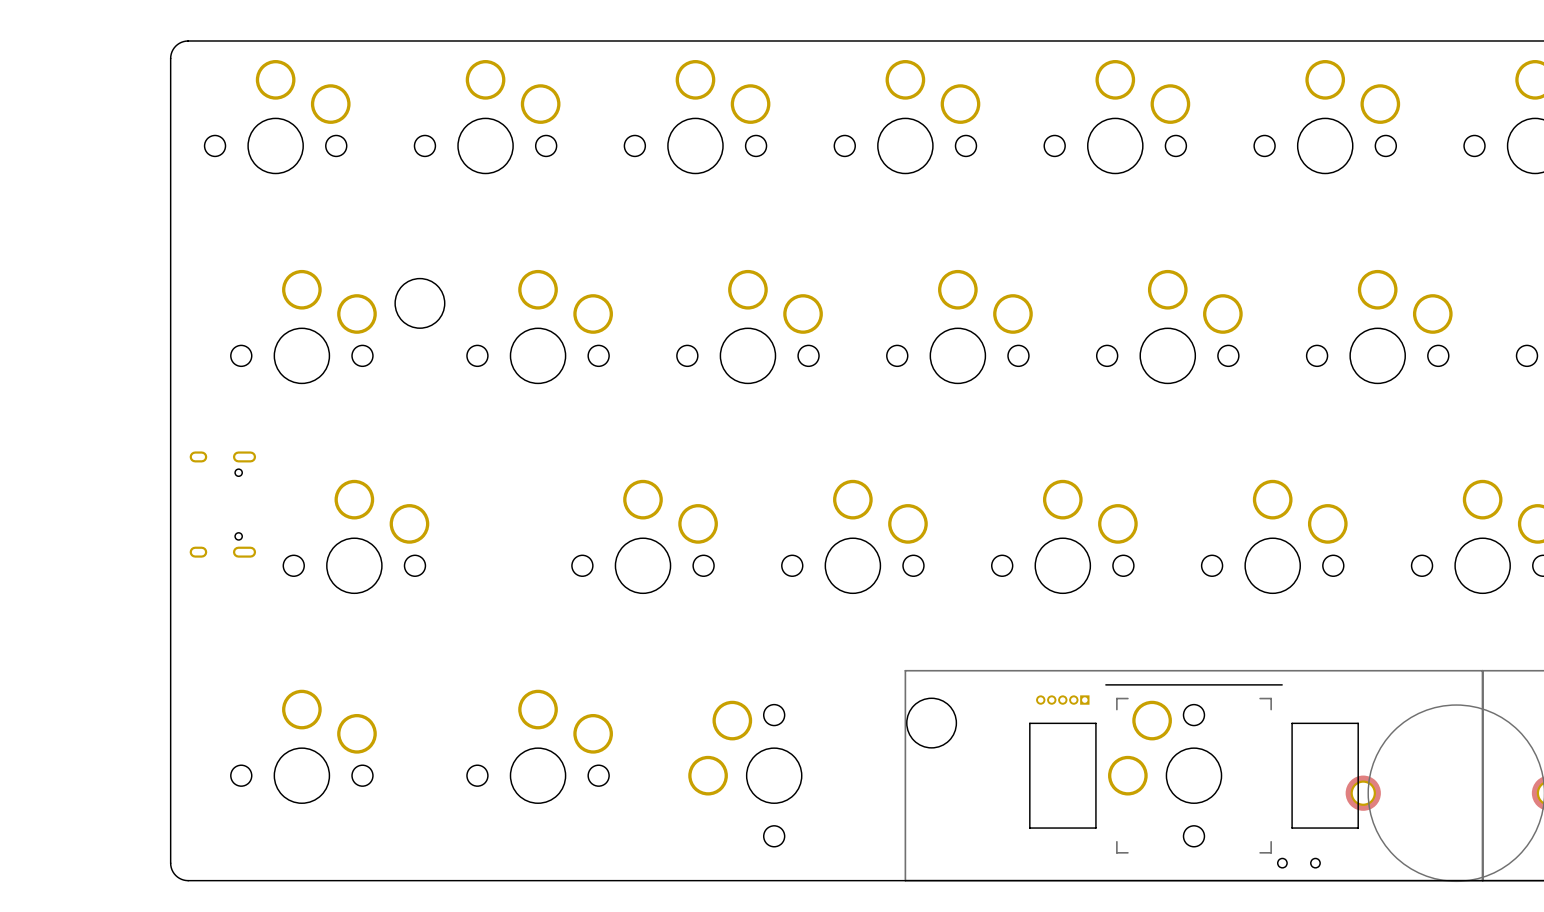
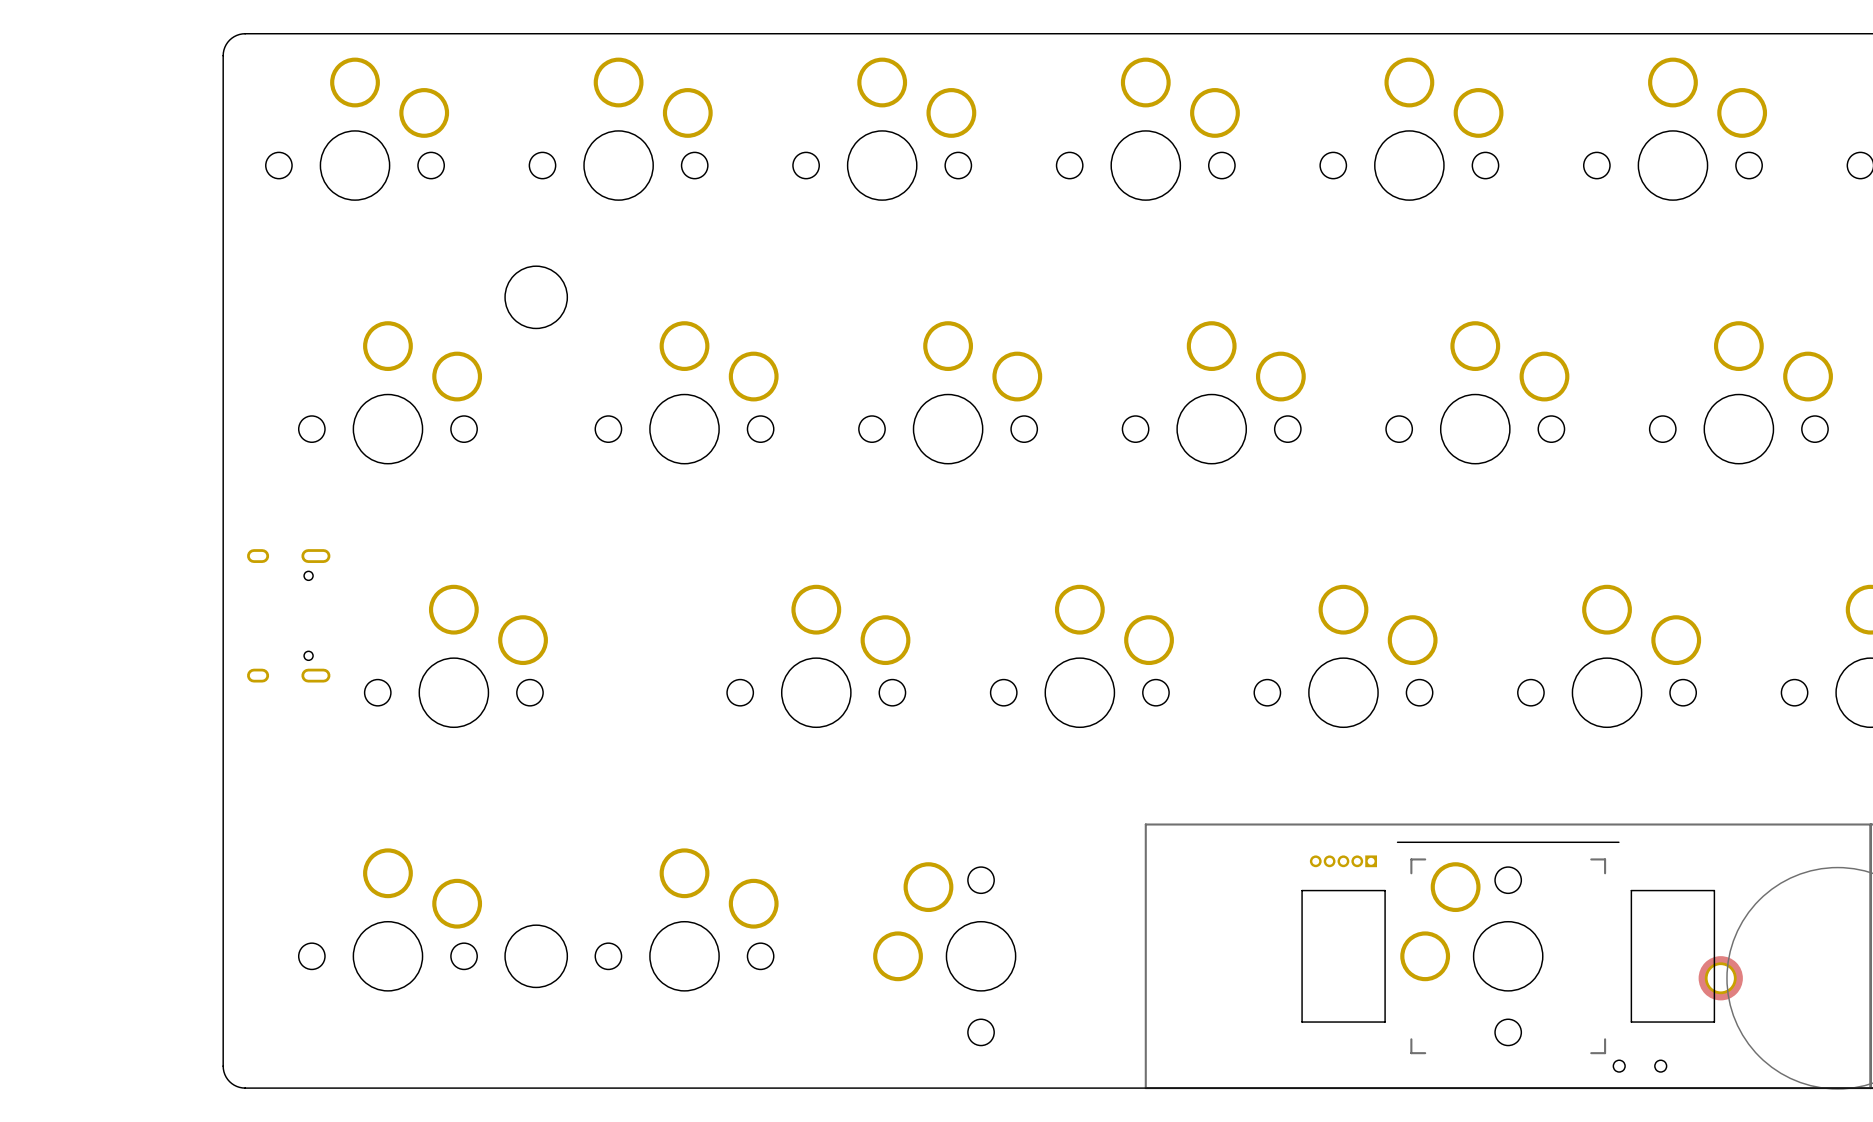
round board edge position: (419, 303) -> (536, 297)
round board edge: [906, 698, 957, 749] -> none
round board edge: none -> [504, 924, 568, 988]

